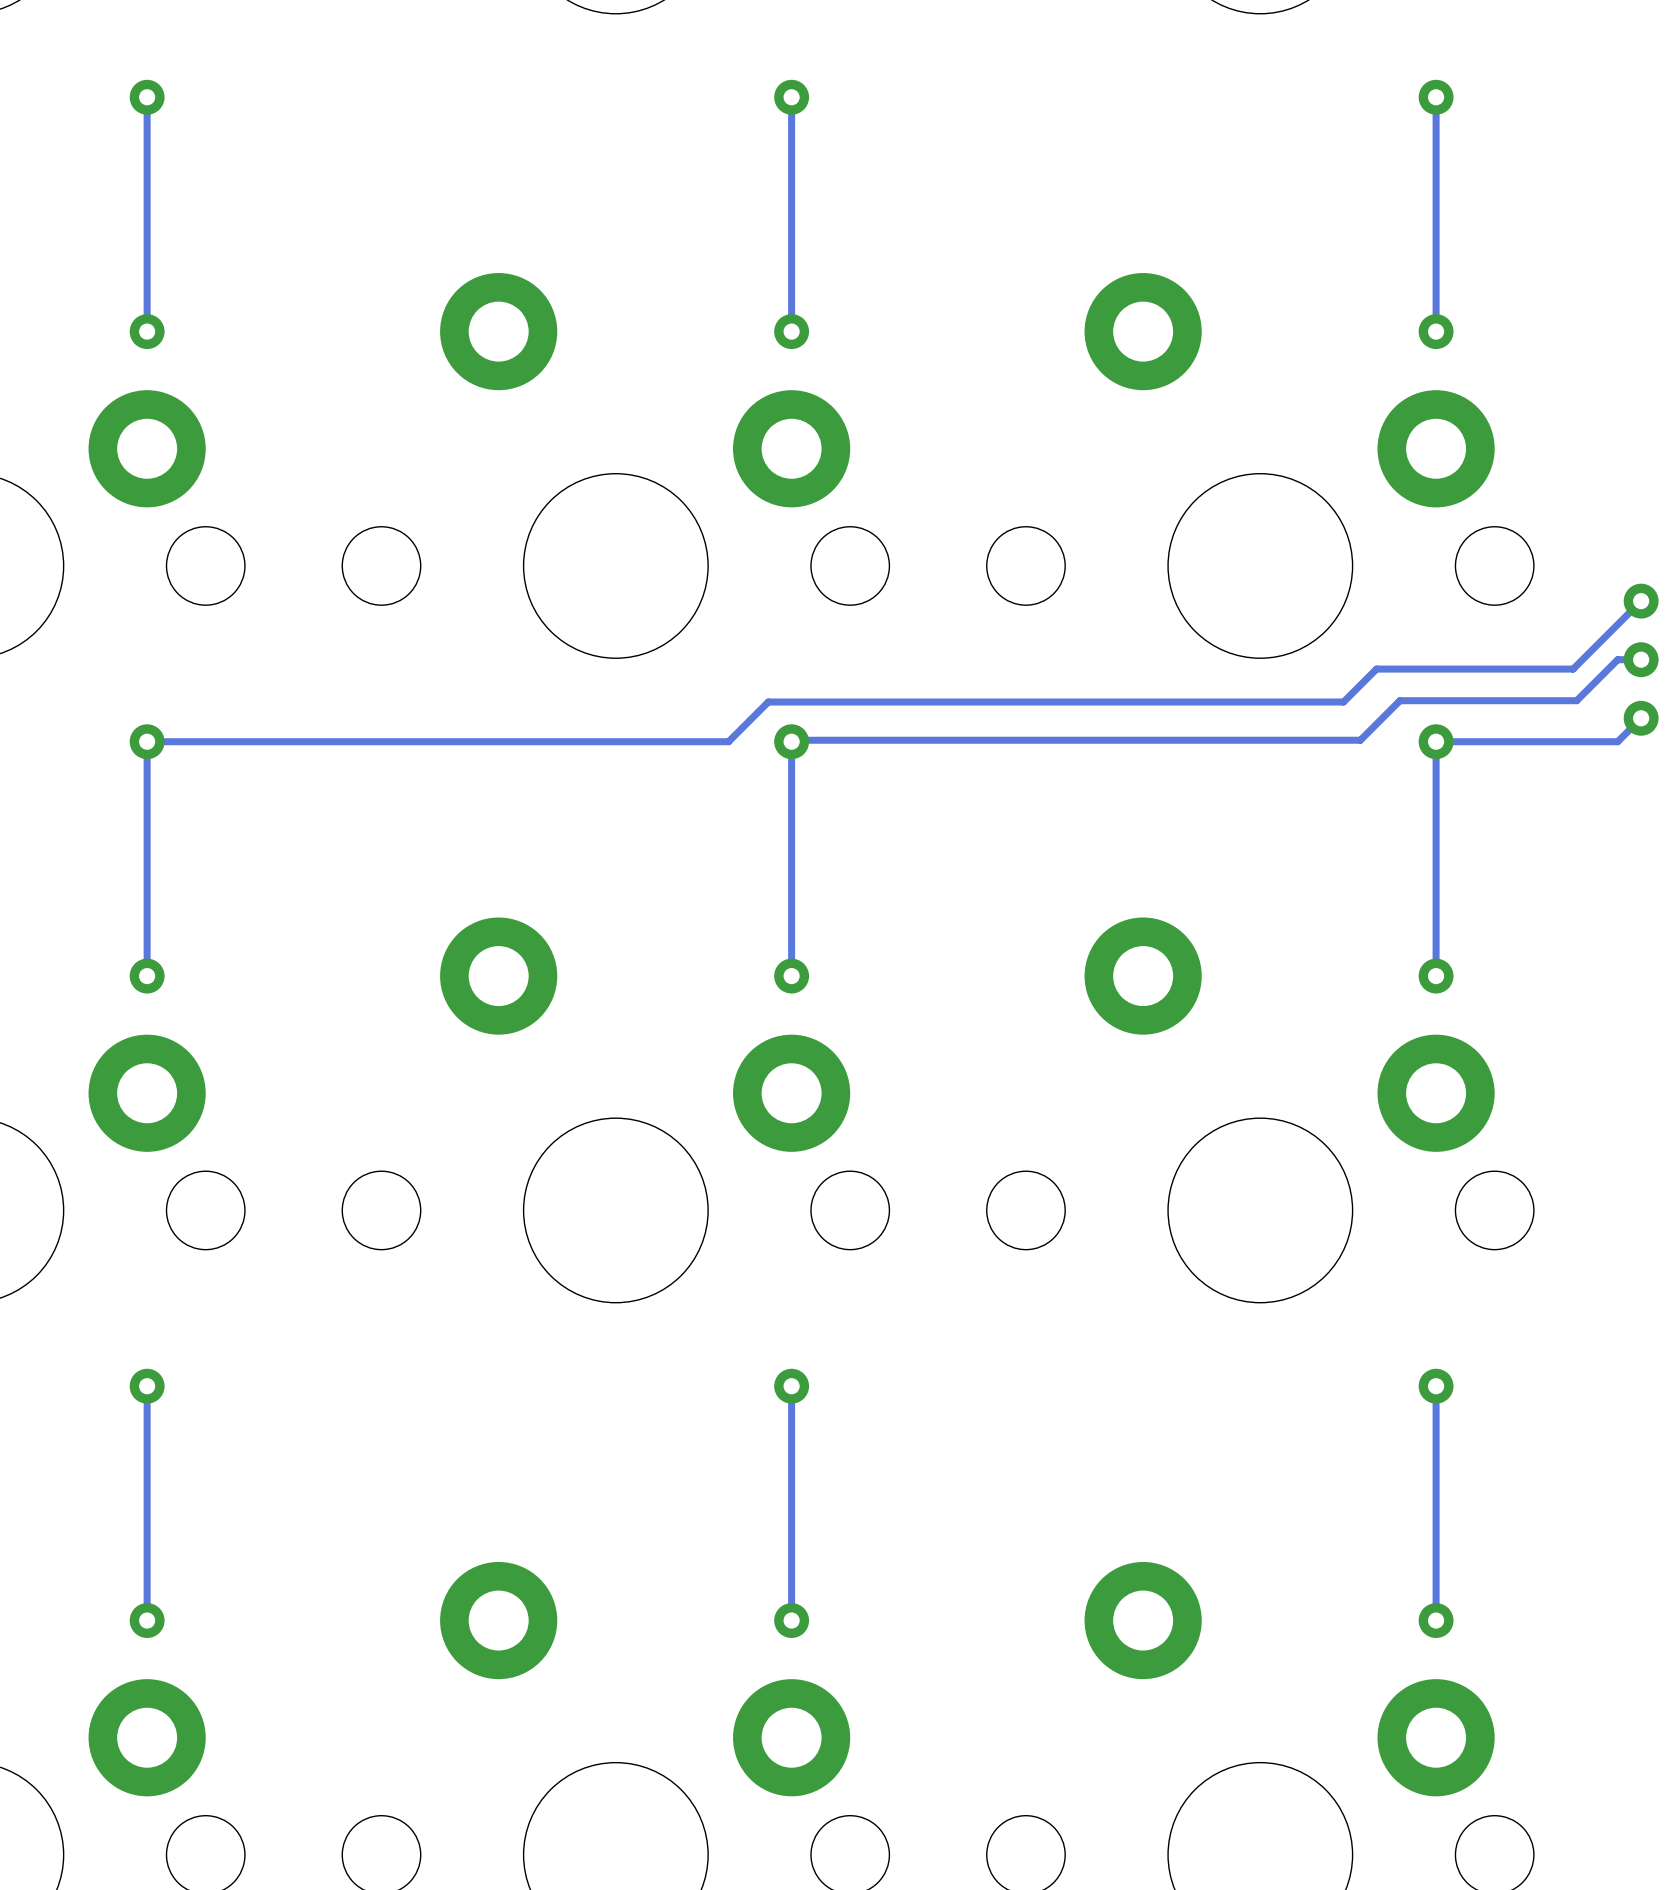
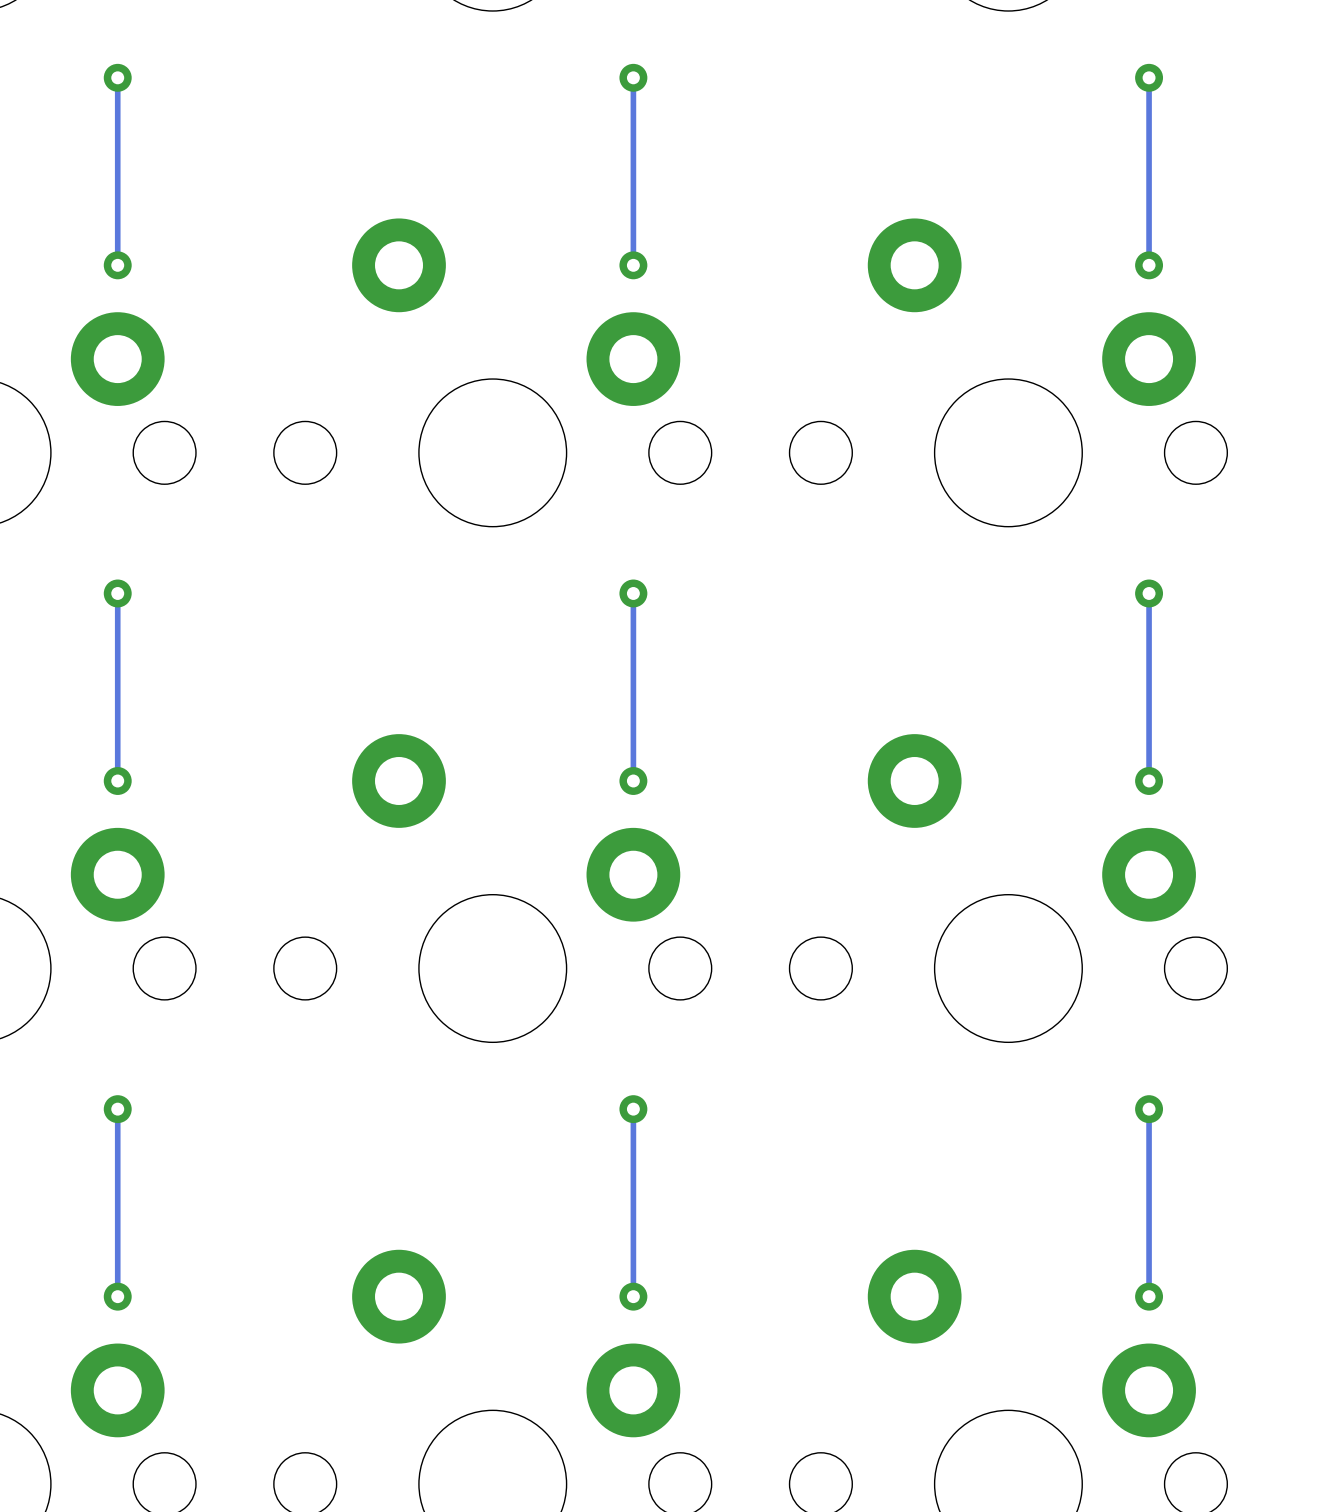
track: (1641, 601) (1573, 669) (1376, 669) (1343, 702) (768, 702) (728, 741) (147, 741) -> none
via: (1641, 601) -> none
track: (1641, 659) (1617, 659) (1576, 700) (1399, 700) (1360, 740) (791, 741) -> none
via: (1641, 659) -> none
track: (1641, 718) (1617, 741) (1436, 741) -> none
via: (1641, 718) -> none

